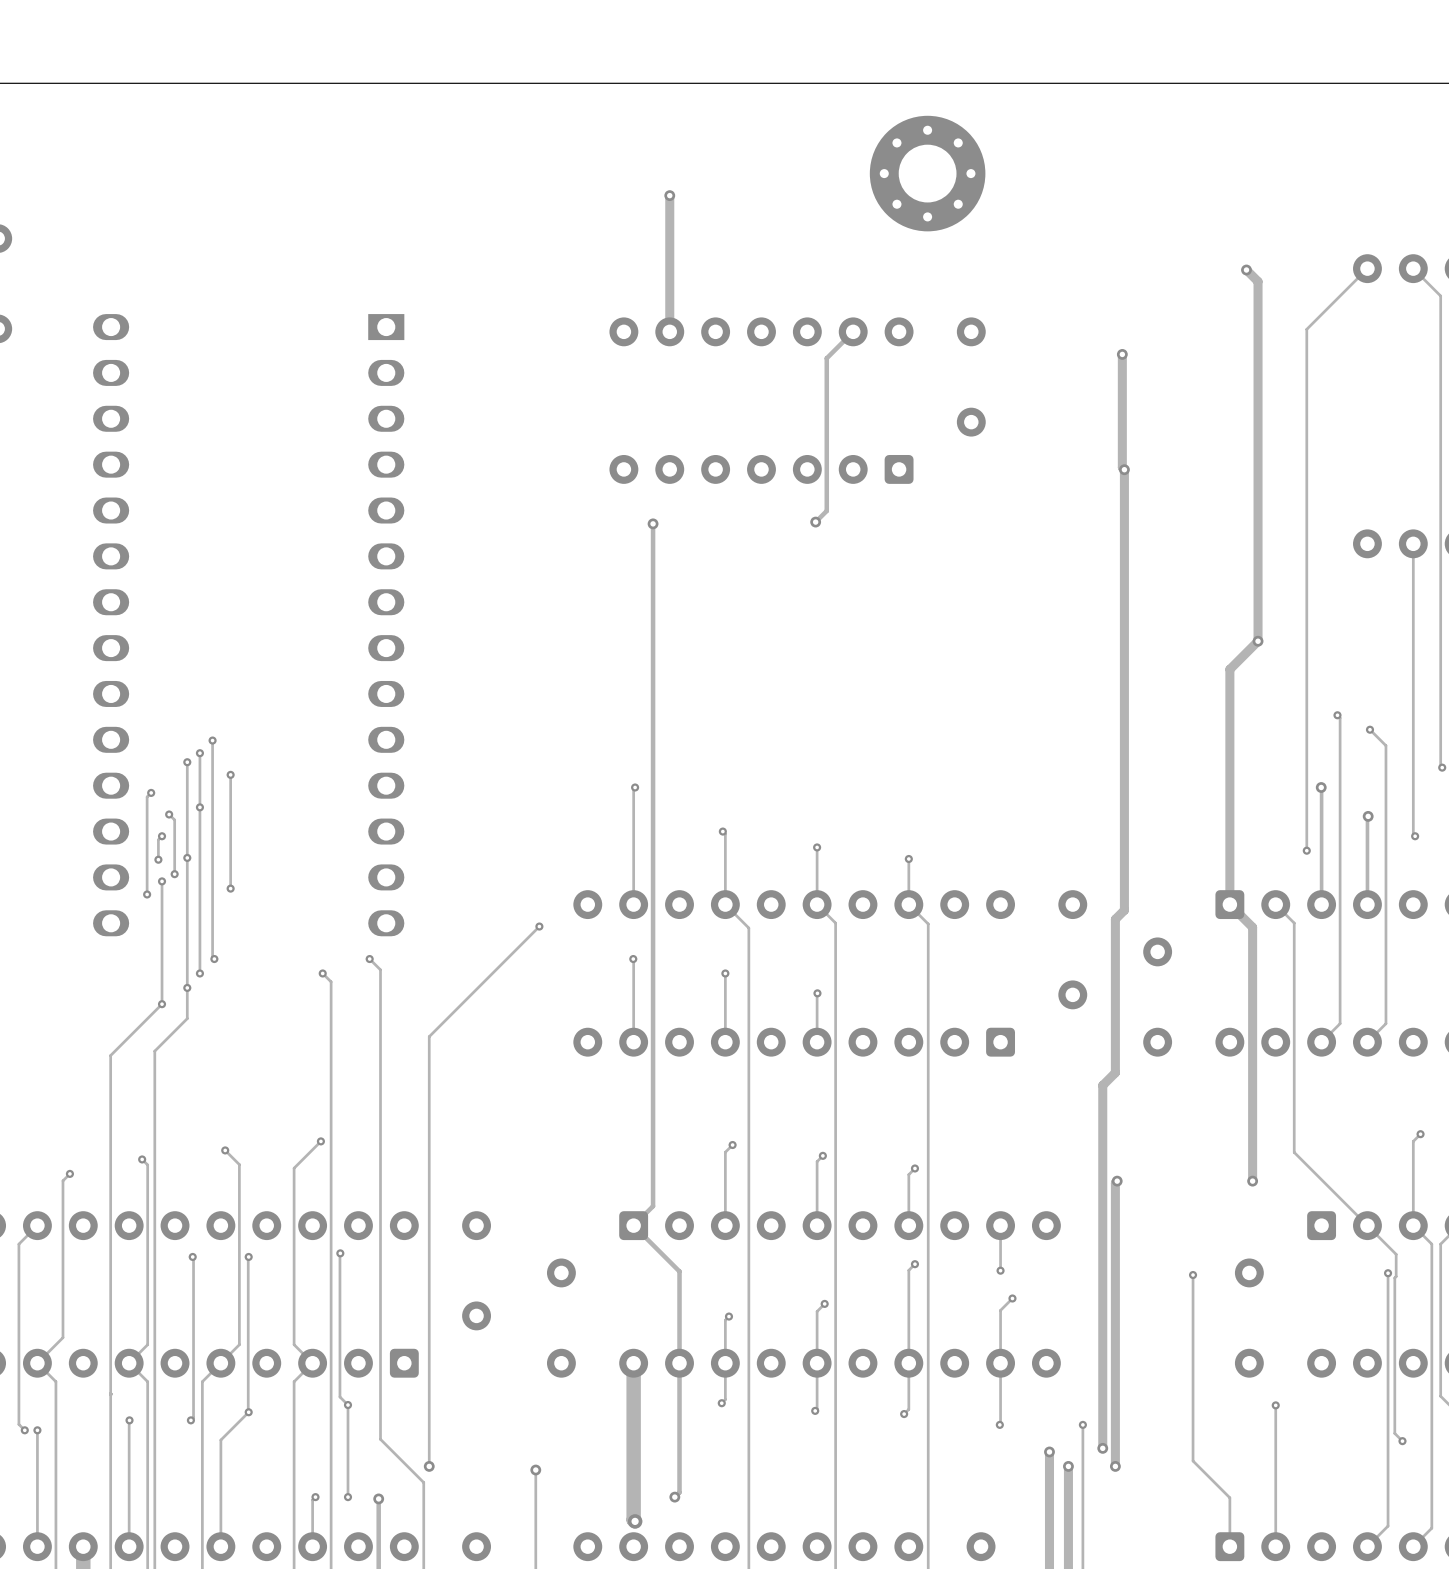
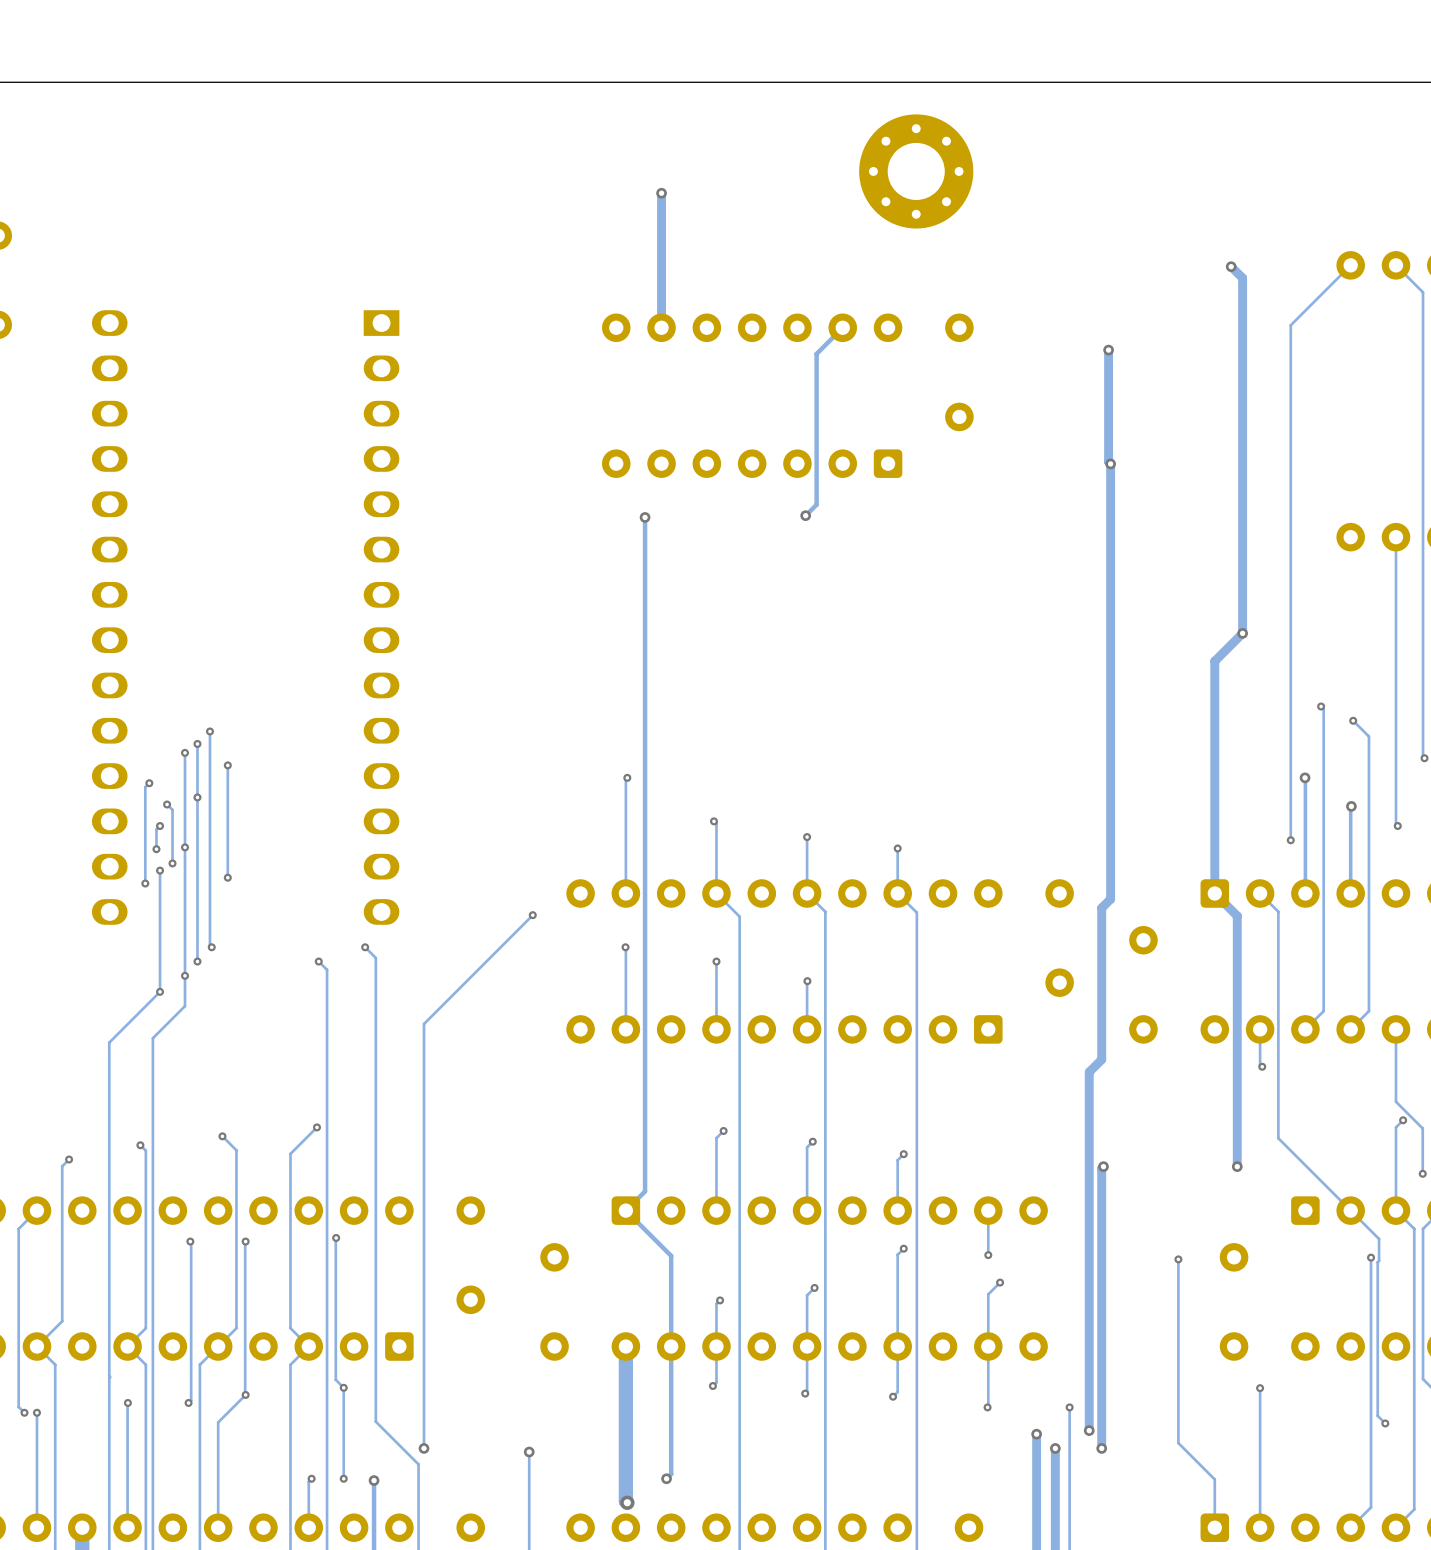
track: none -> (1260, 1029) (1260, 1064) (1262, 1066)
track: none -> (1396, 1029) (1396, 1101) (1422, 1128) (1422, 1173)
via: none -> (1262, 1066)
via: none -> (1422, 1173)

